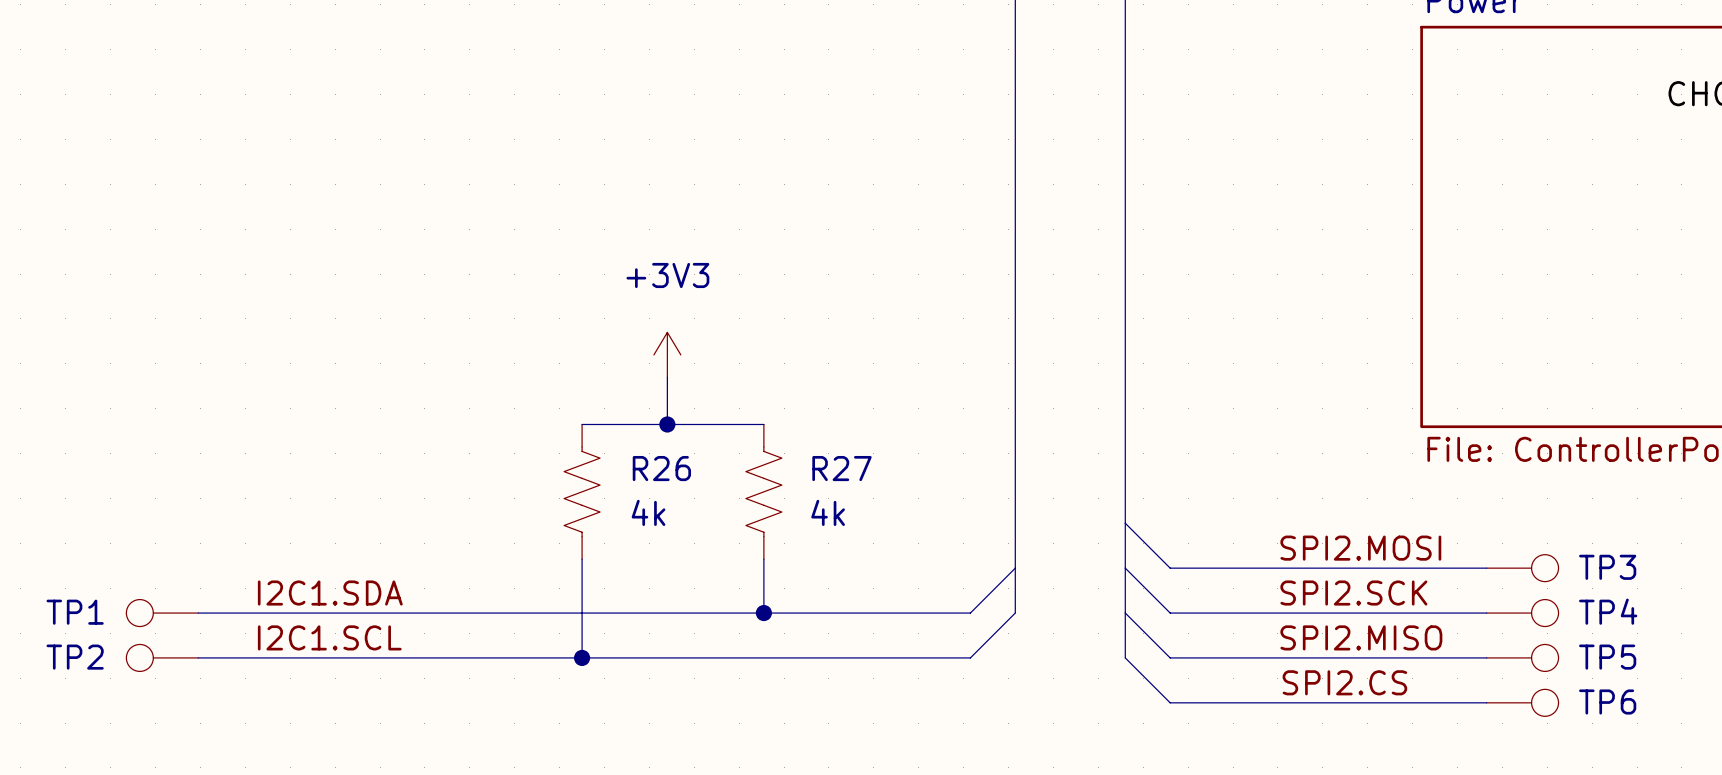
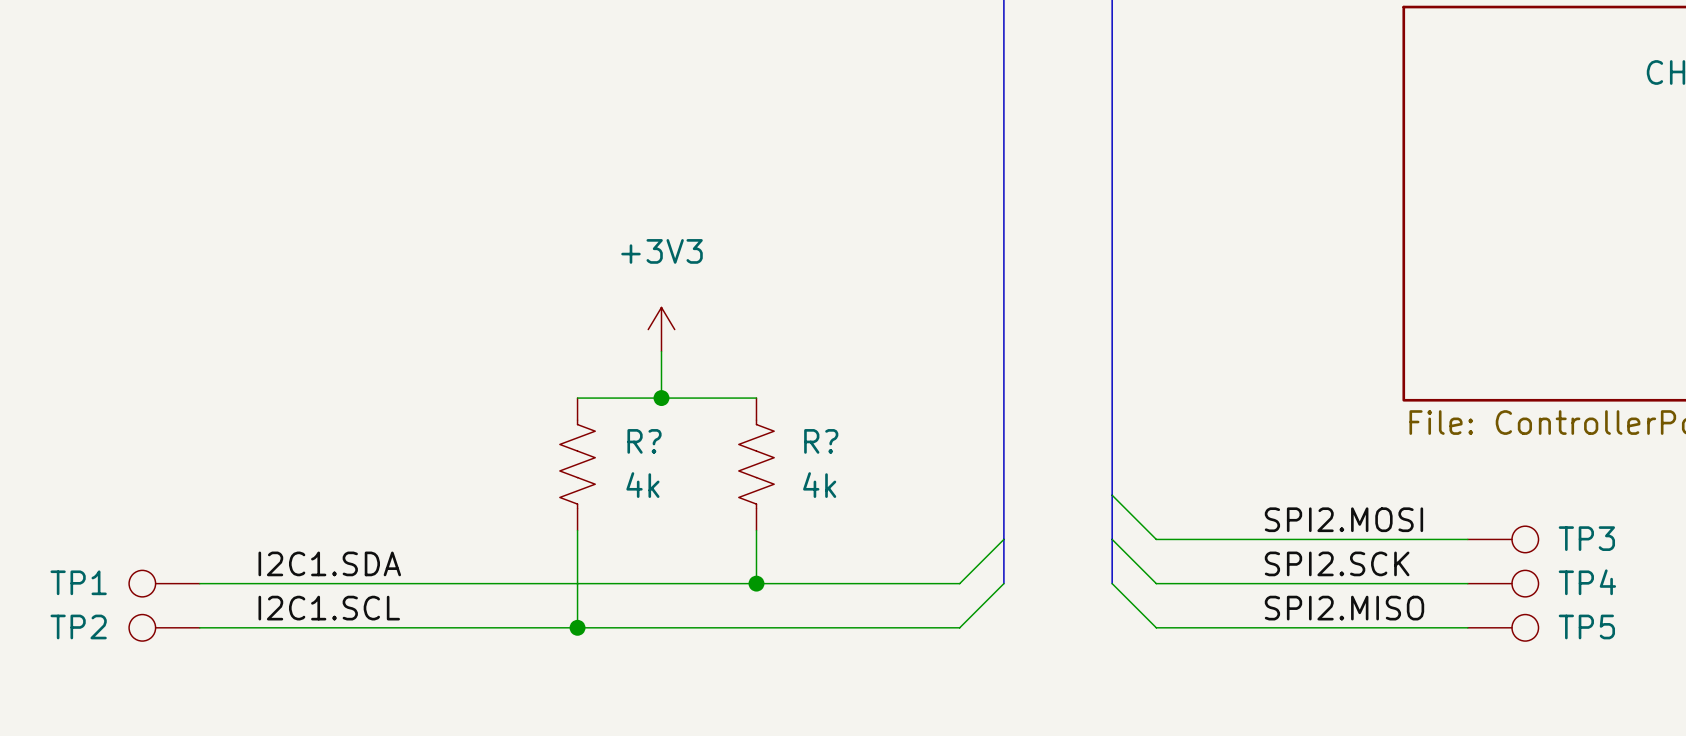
R26 name: R26 (661, 468) -> R? (644, 441)
R27 name: R27 (841, 468) -> R? (821, 441)
bus: (1125, 613) (1125, 657) -> none
wire: (1125, 657) (1170, 702) (1486, 702) -> none
label: SPI2.CS (1344, 682) -> none
TP6: (1522, 702) -> none

